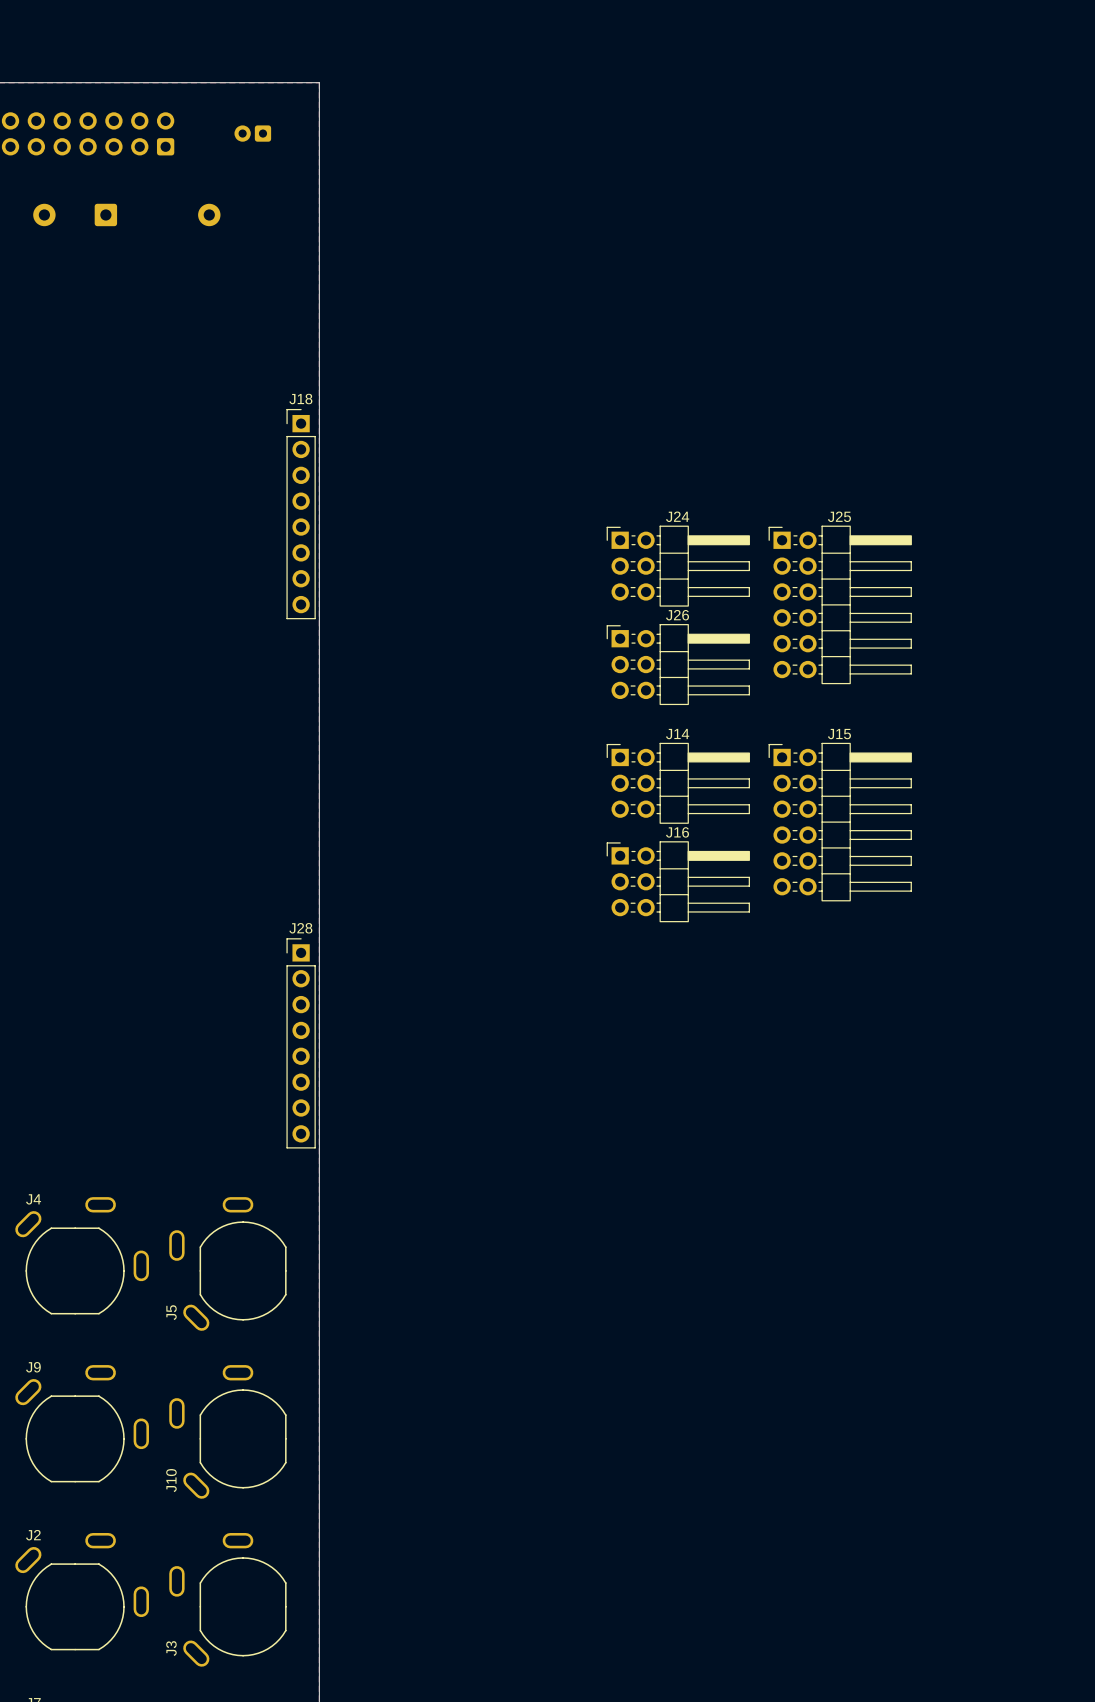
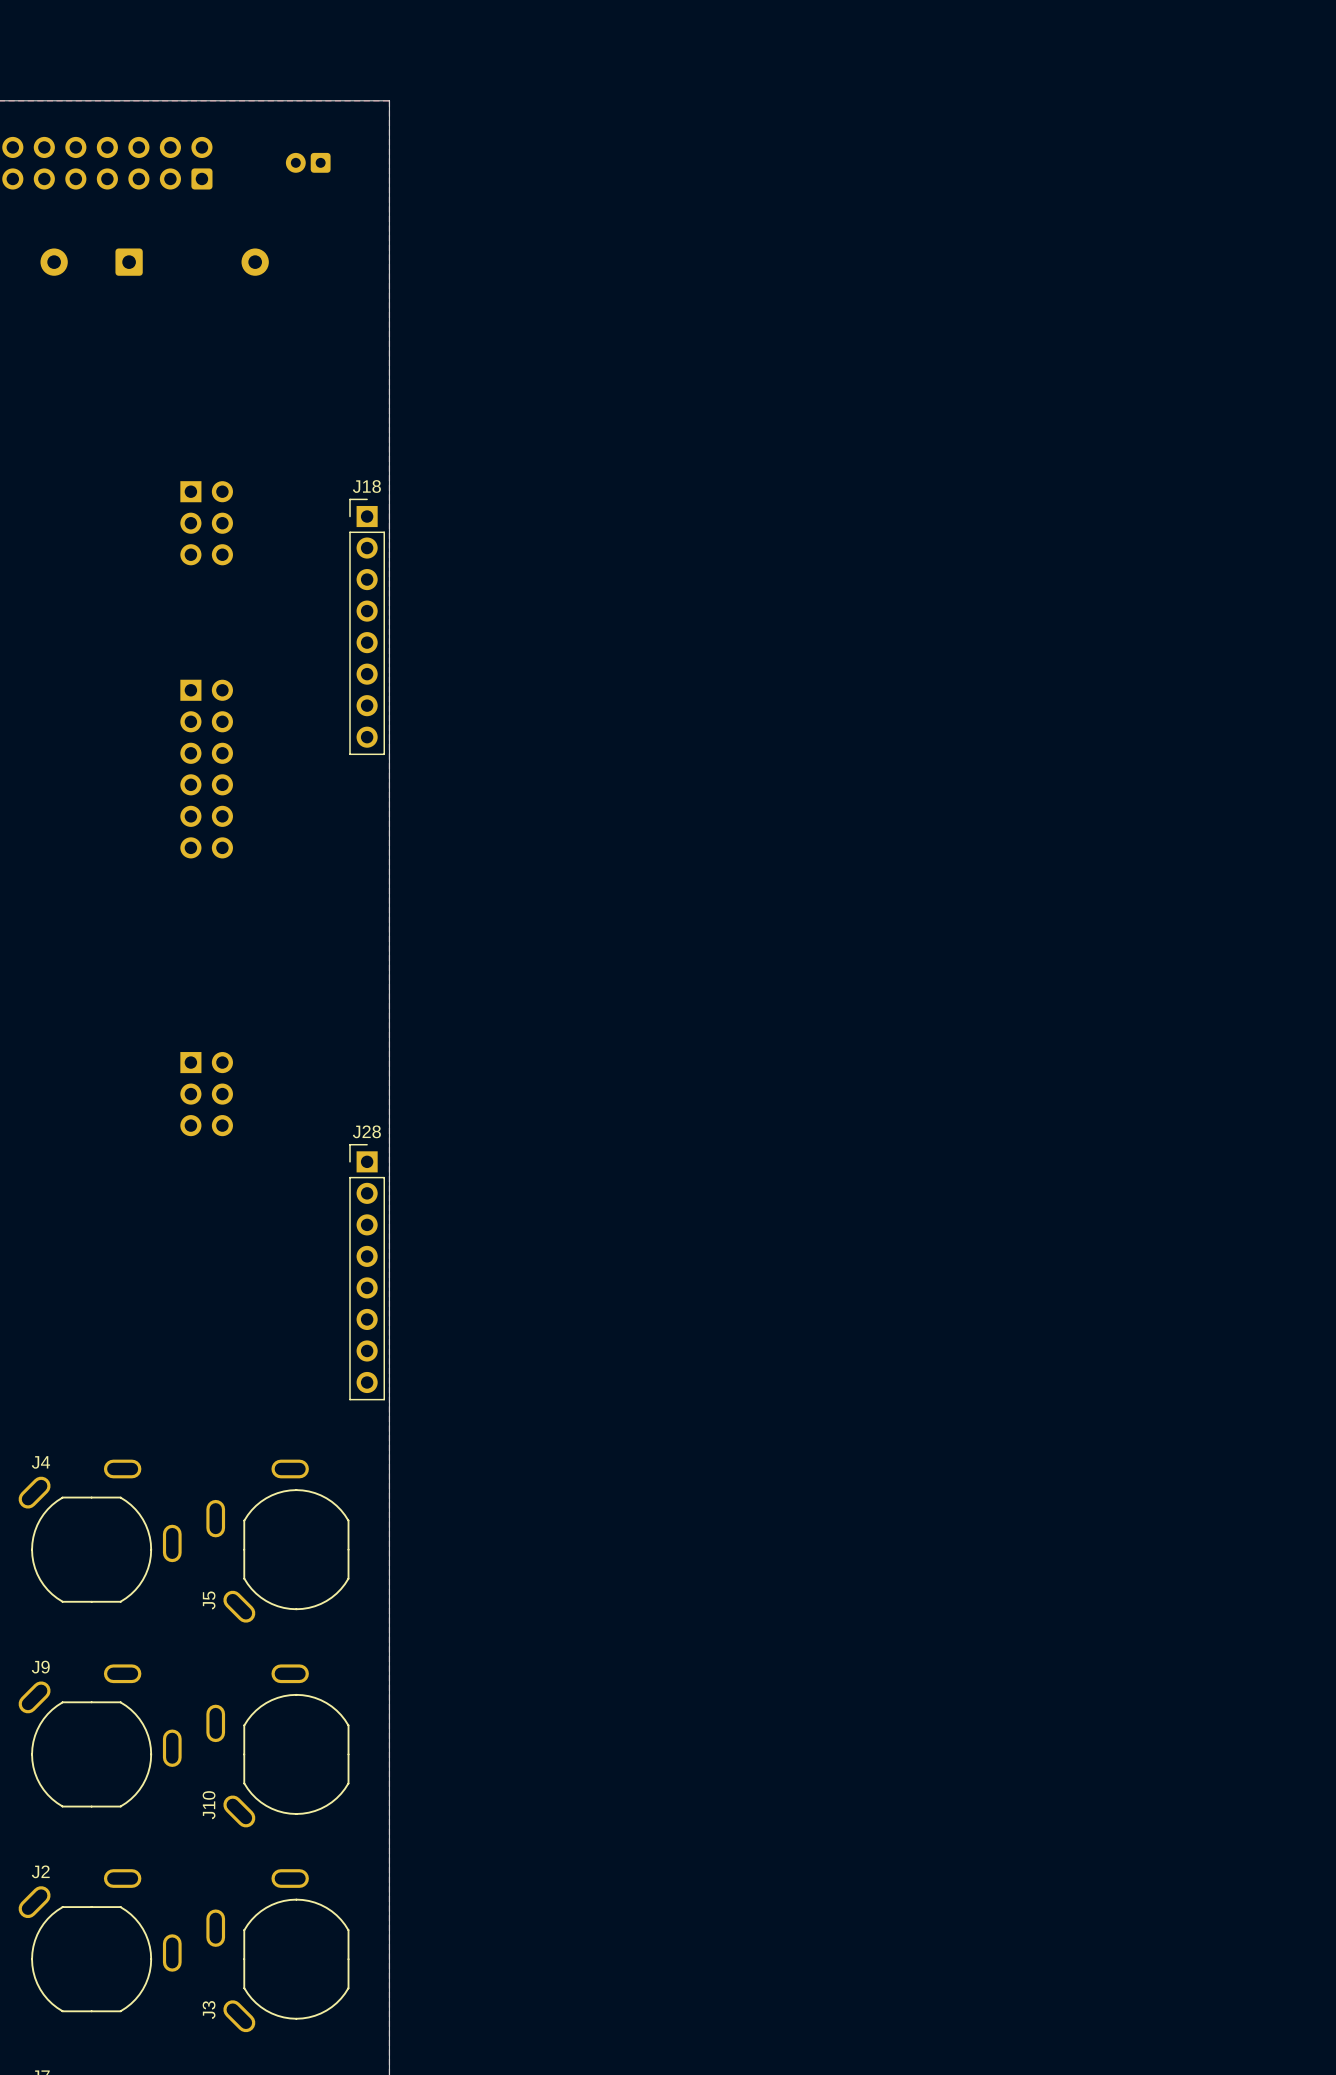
part: none -> (206, 523)
J24: (678, 566) -> none
J25: (840, 604) -> none
part: none -> (206, 769)
J26: (678, 664) -> none
J14: (678, 783) -> none
J15: (840, 822) -> none
J16: (678, 881) -> none
part: none -> (206, 1094)

